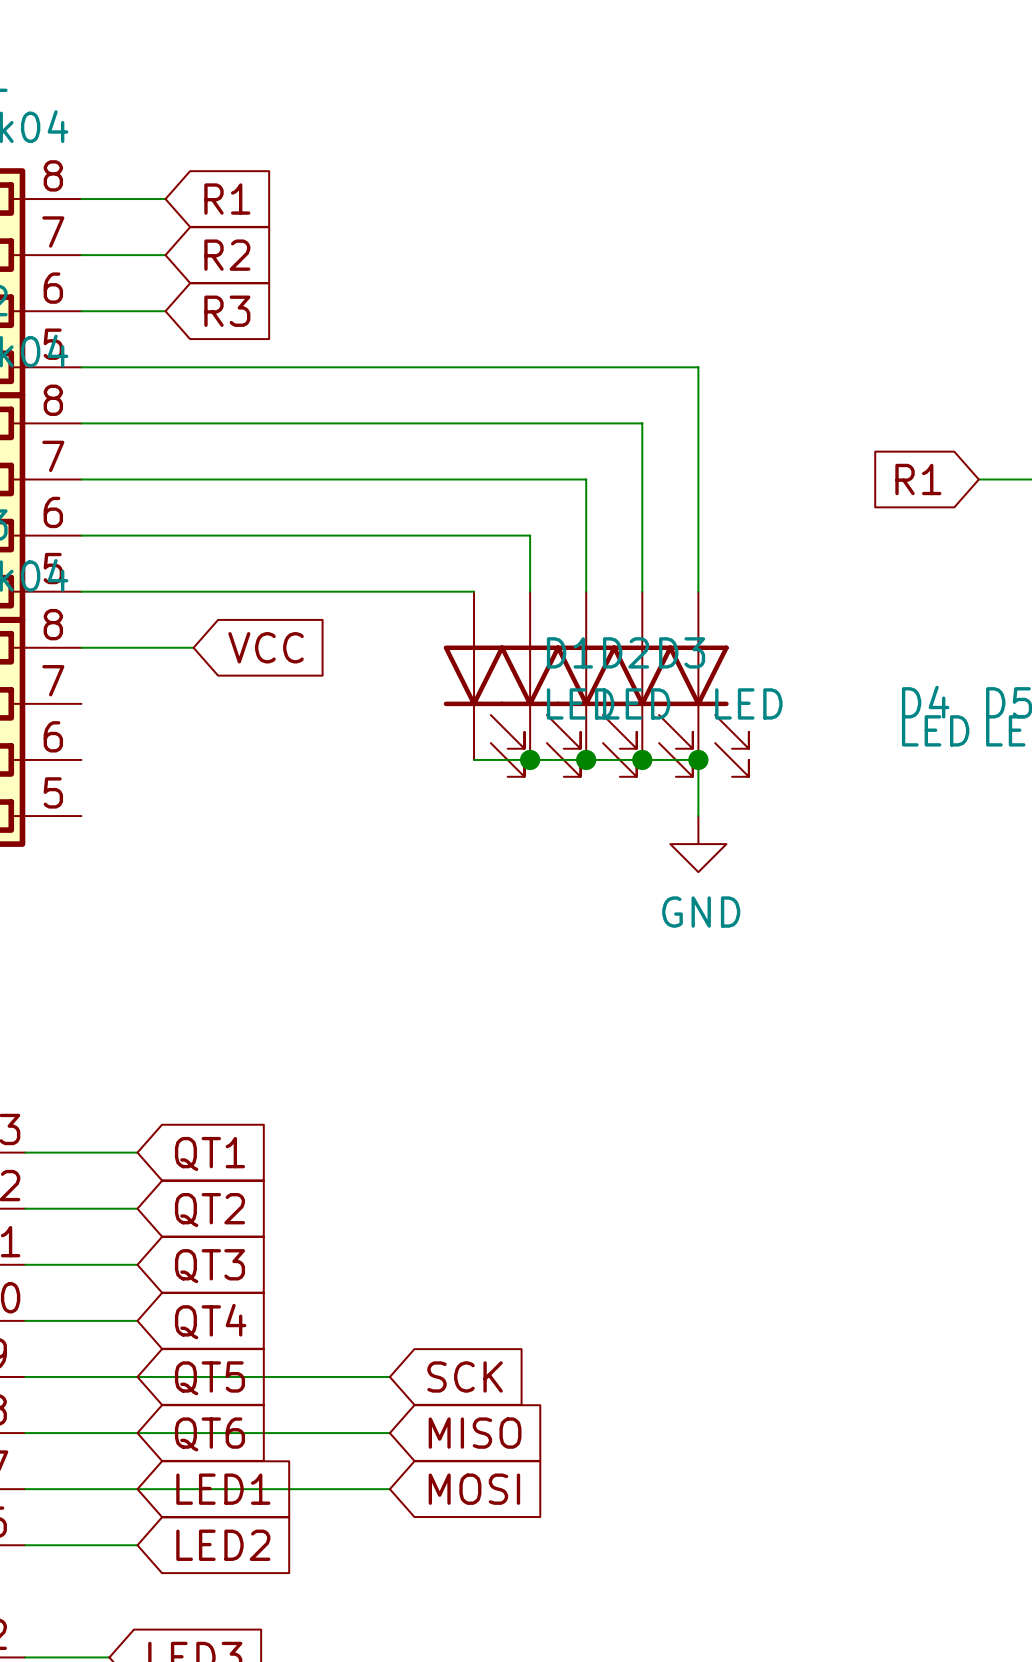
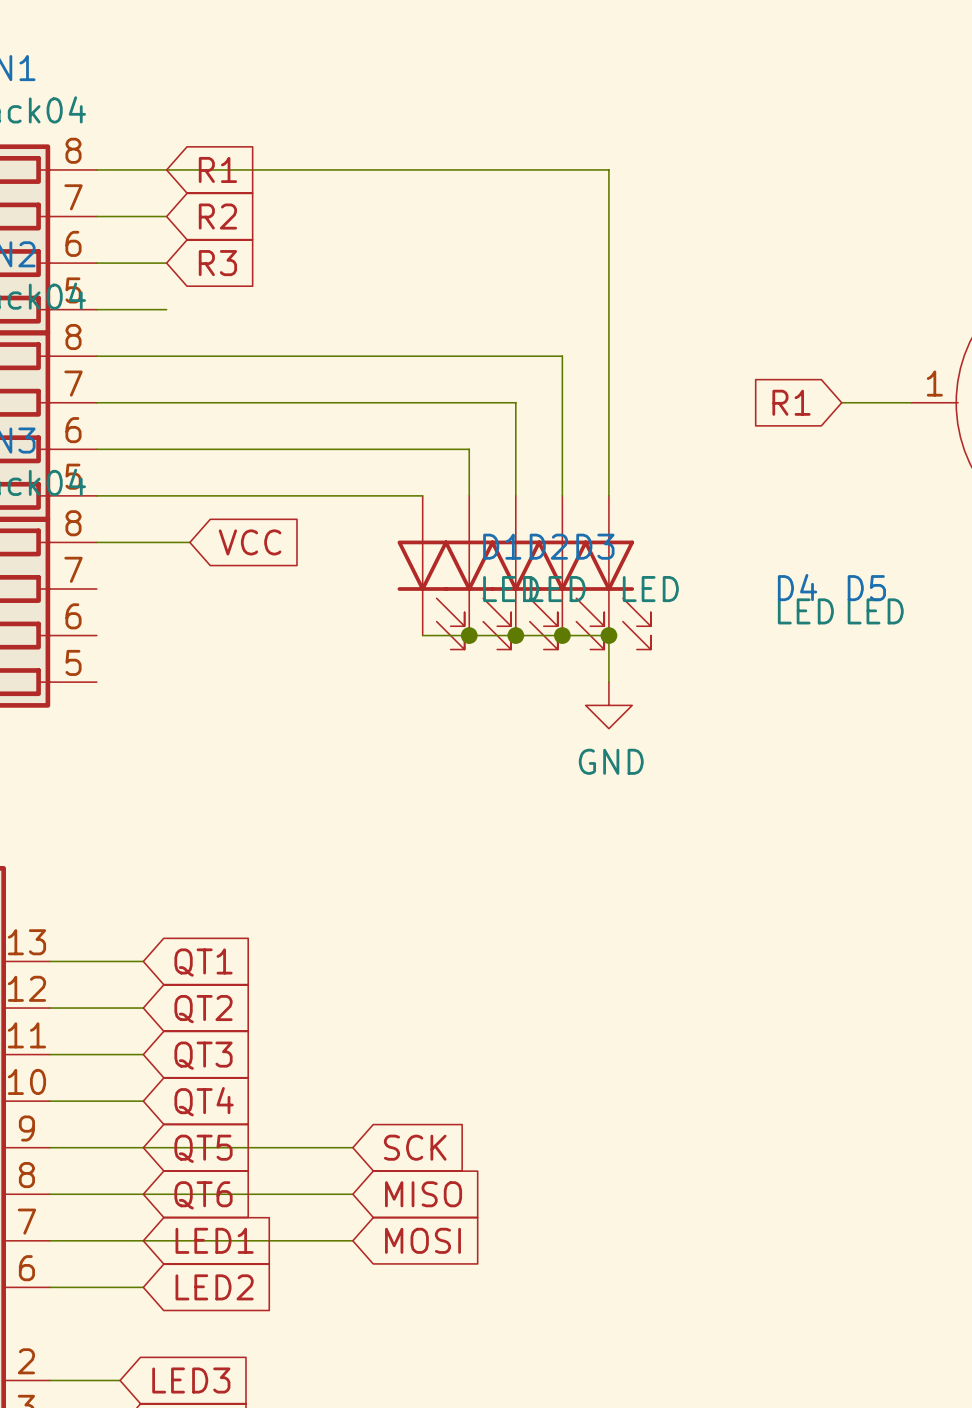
wire: (165, 367) (698, 367) -> (166, 169) (608, 169) (608, 309)

